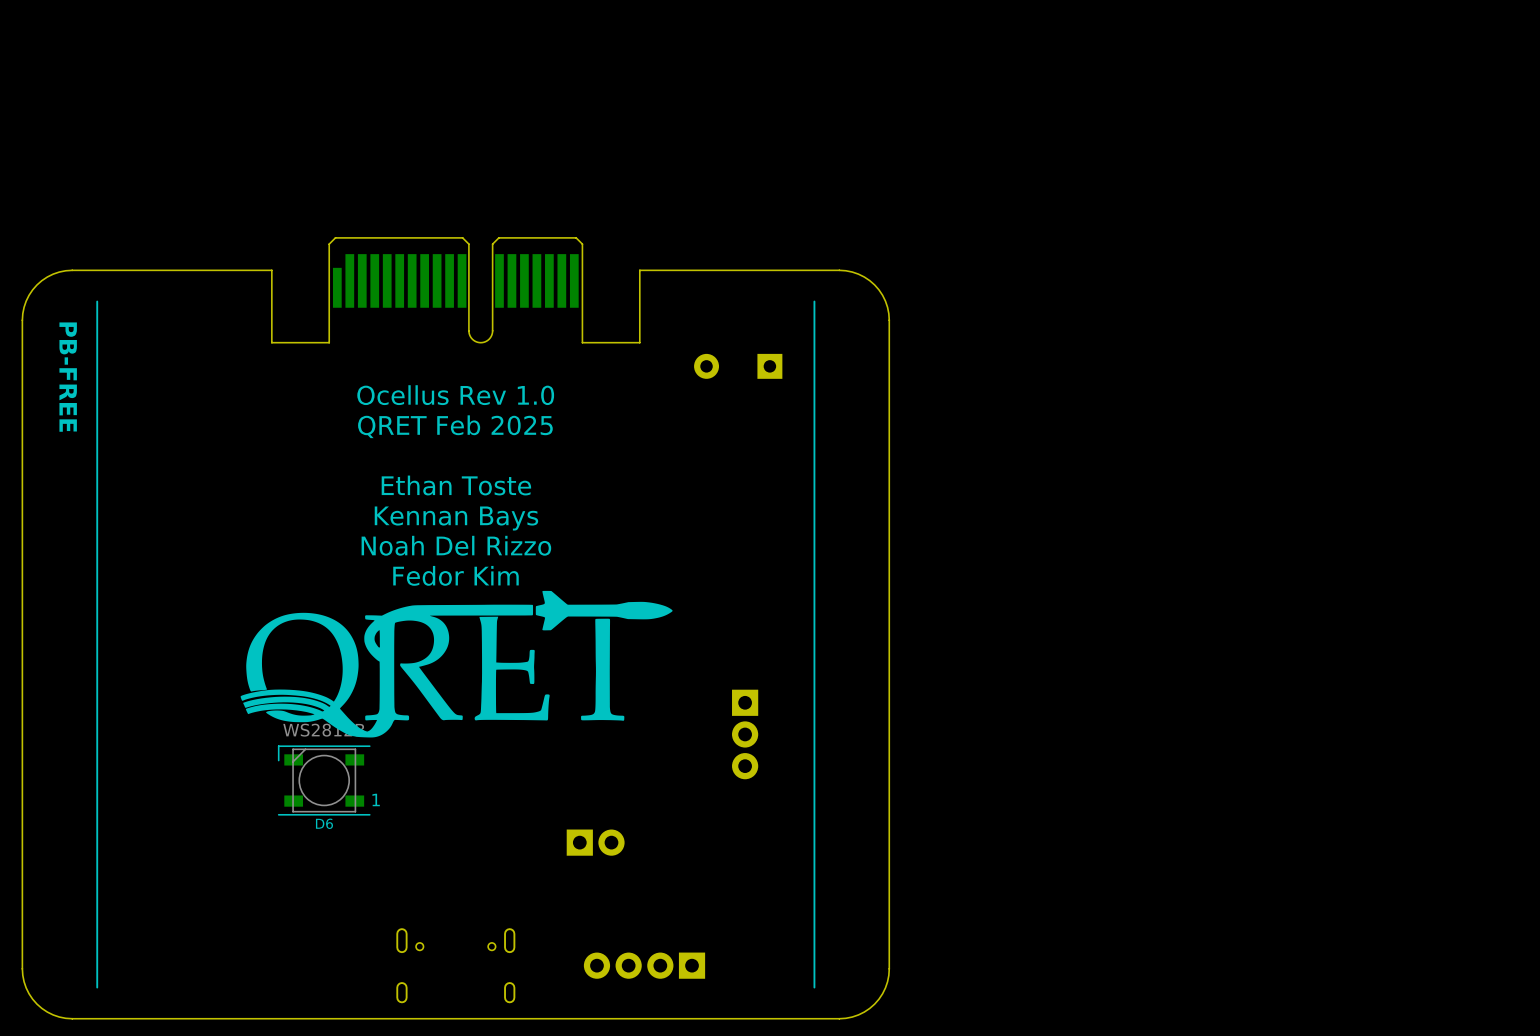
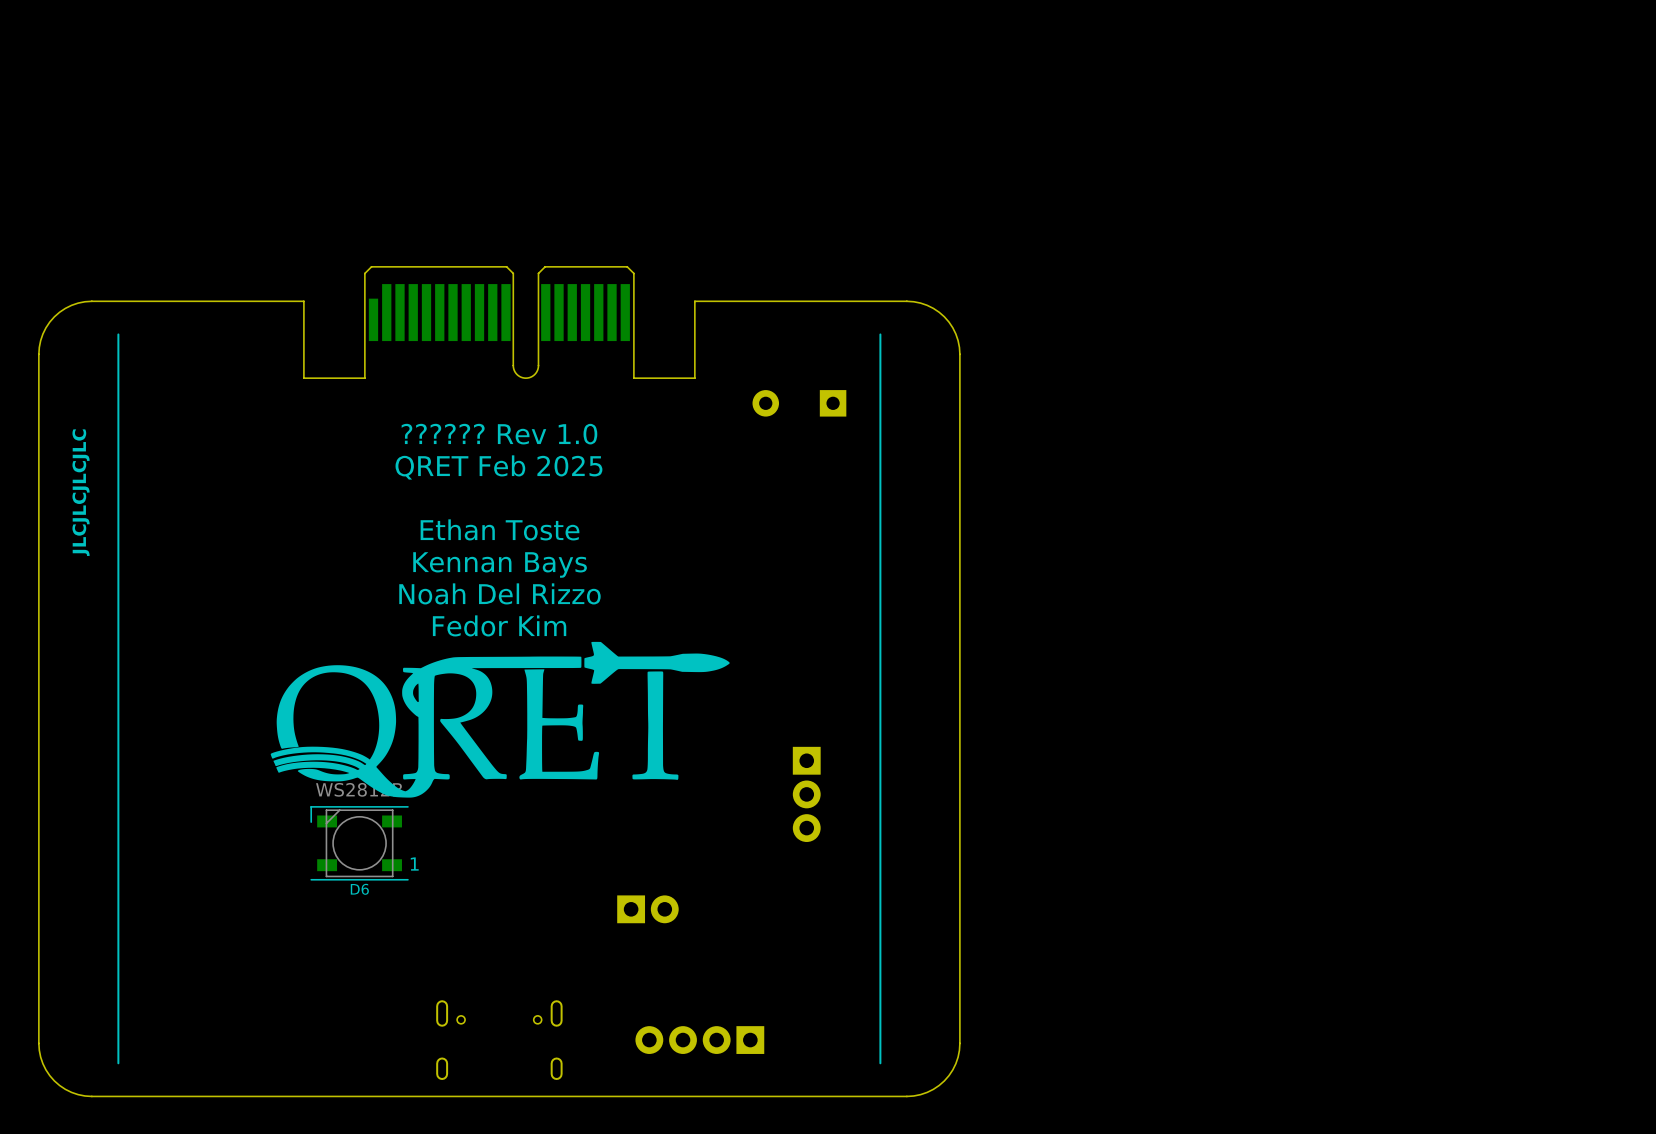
text: PB-FREE (68, 377) -> none
text: Ocellus Rev 1.0 (455, 395) -> ?????? Rev 1.0 (499, 434)
text: none -> JLCJLCJLCJLC (81, 492)

